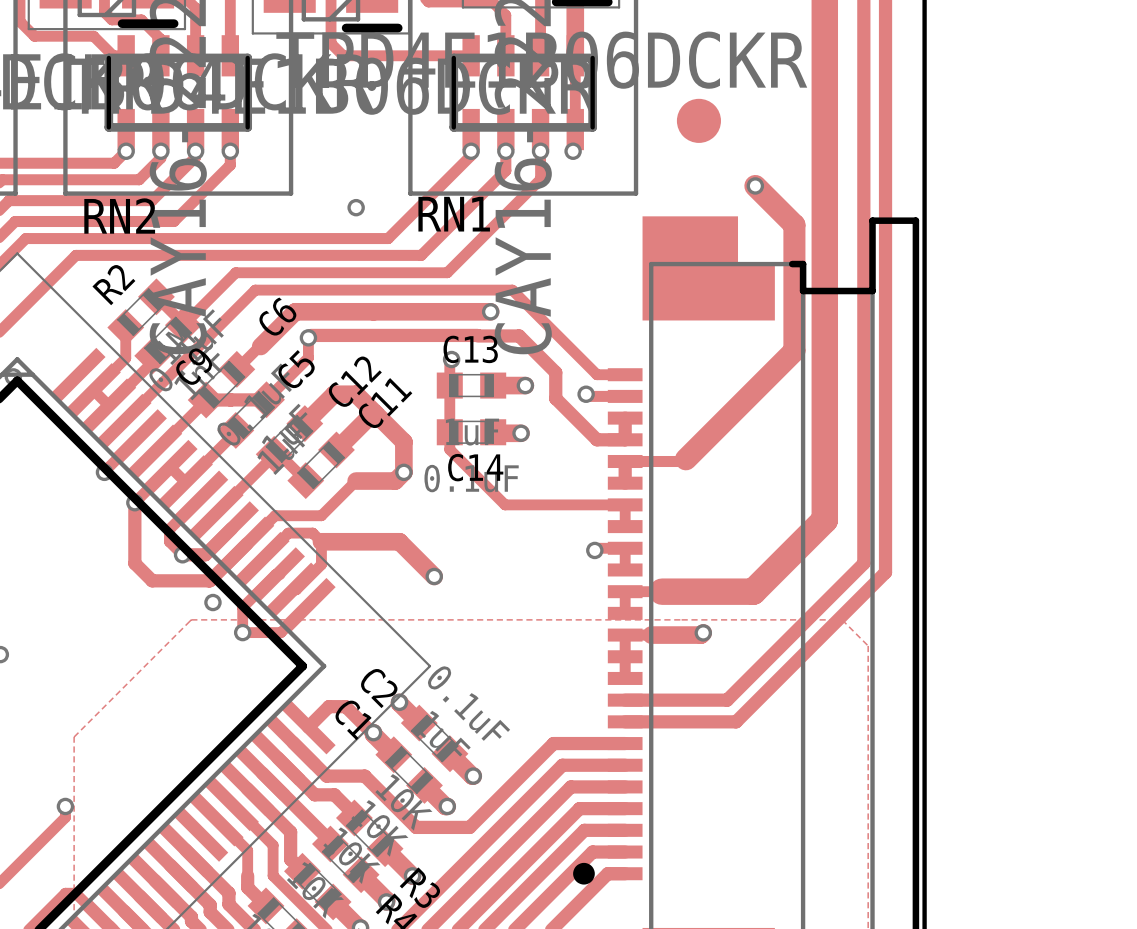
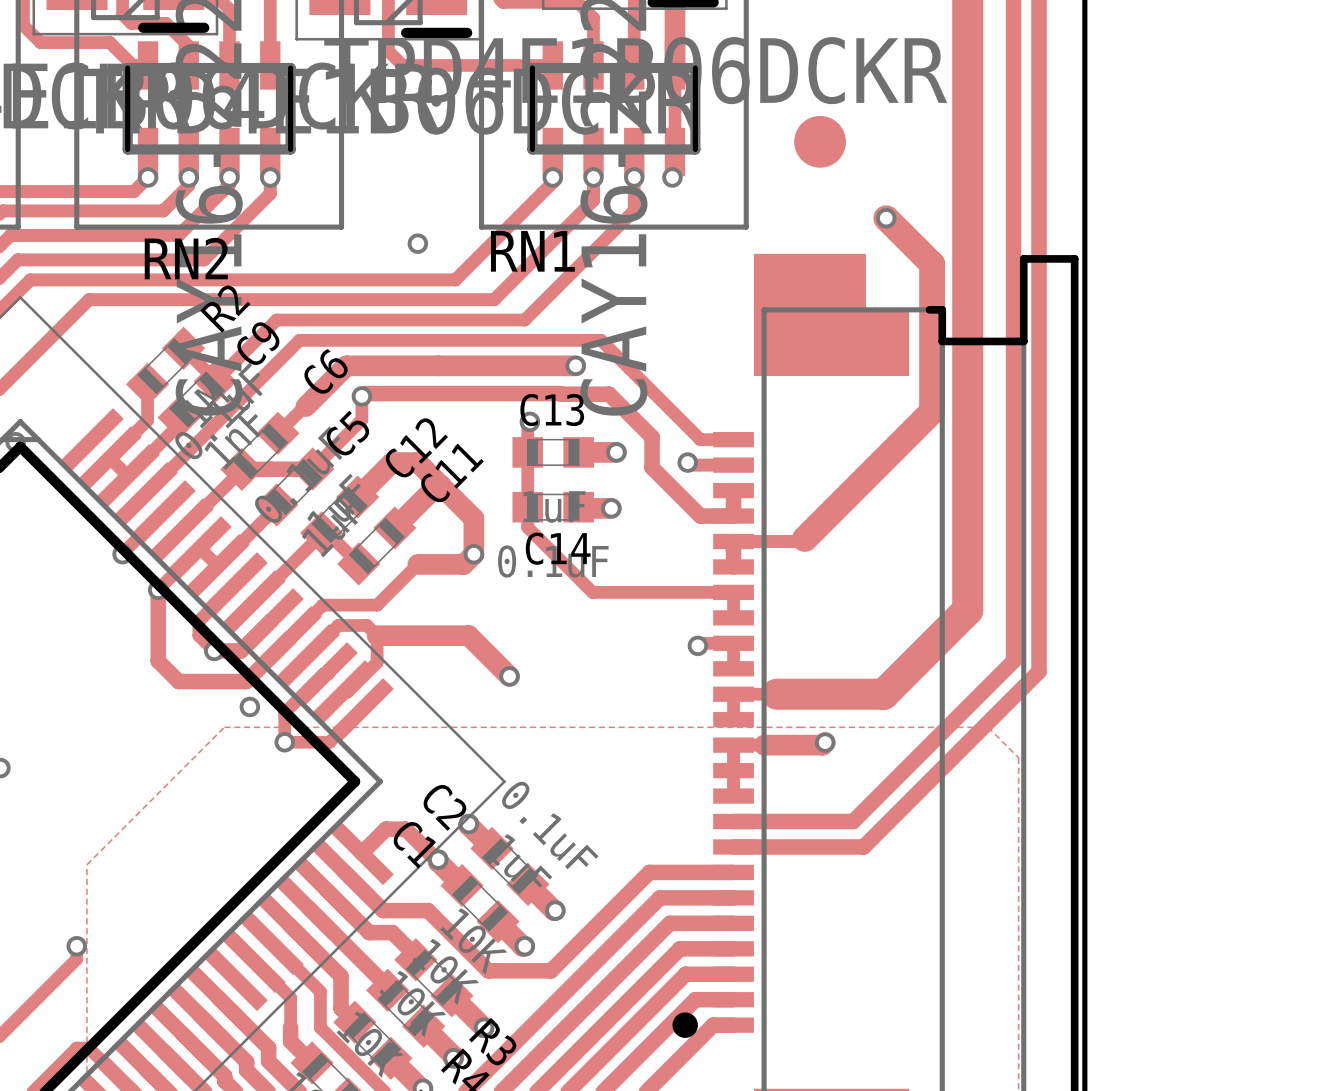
RN2 name position: RN2 (119, 216) -> RN2 (186, 258)
R2 name position: R2 (113, 285) -> R2 (225, 309)
C9 name position: C9 (194, 366) -> C9 (258, 343)

